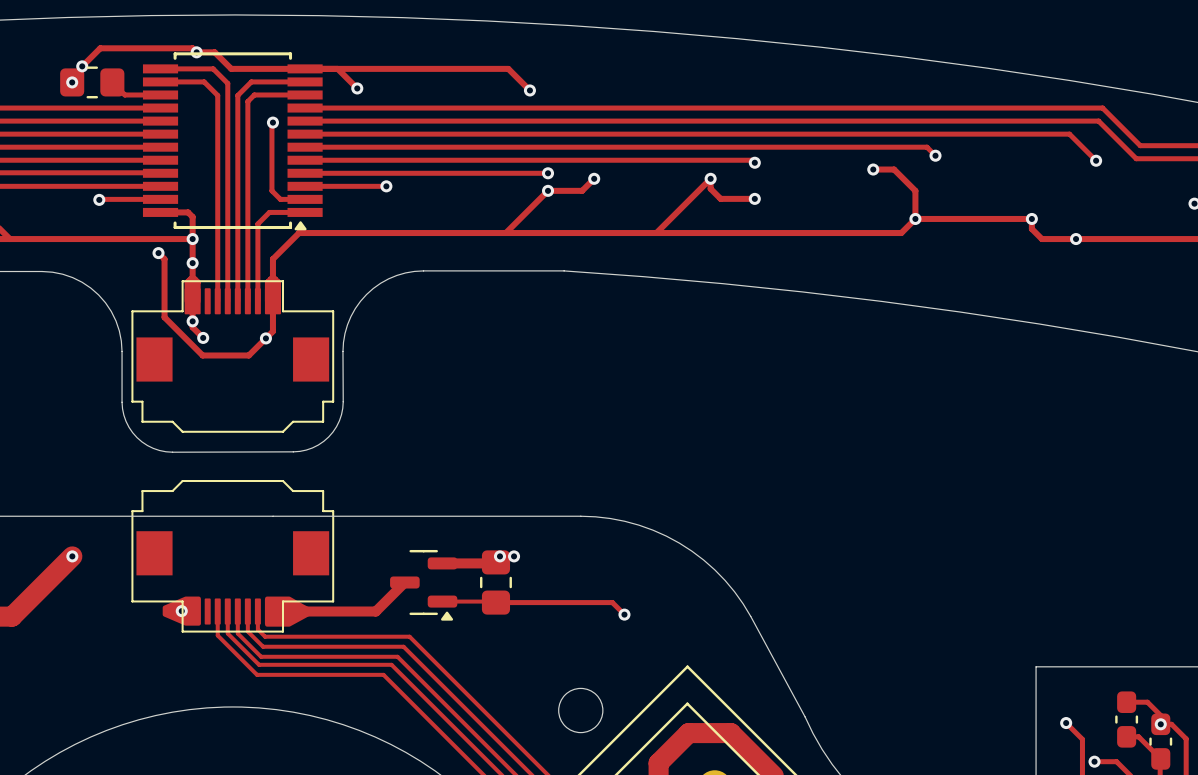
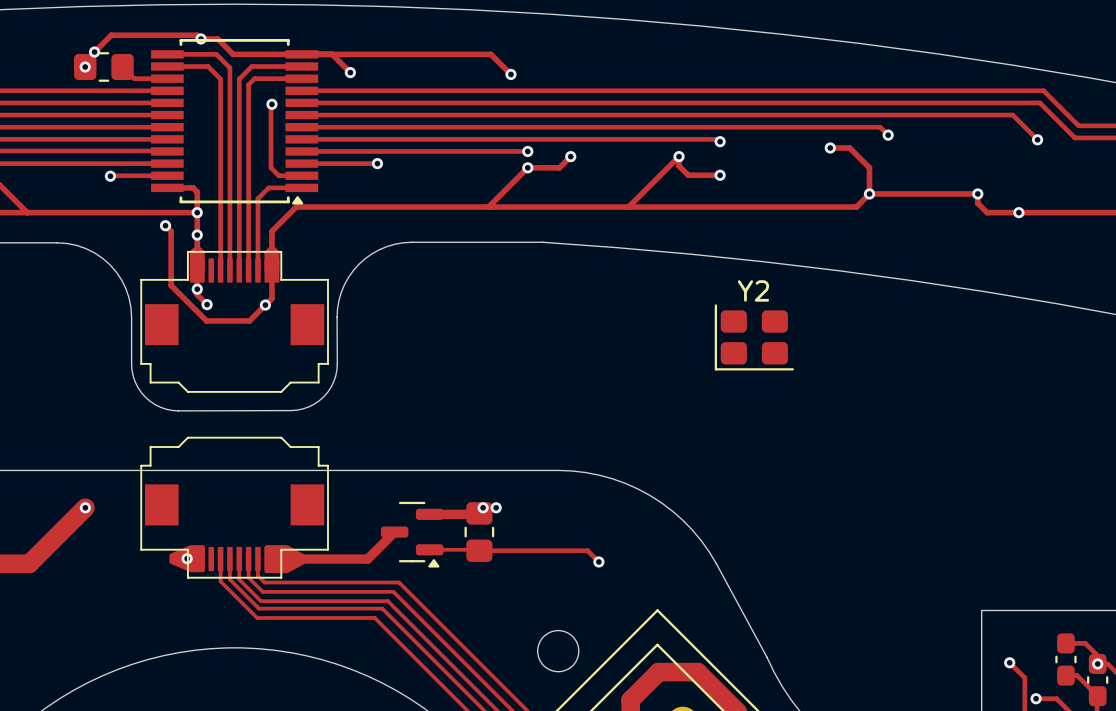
Y2: none -> (754, 337)

